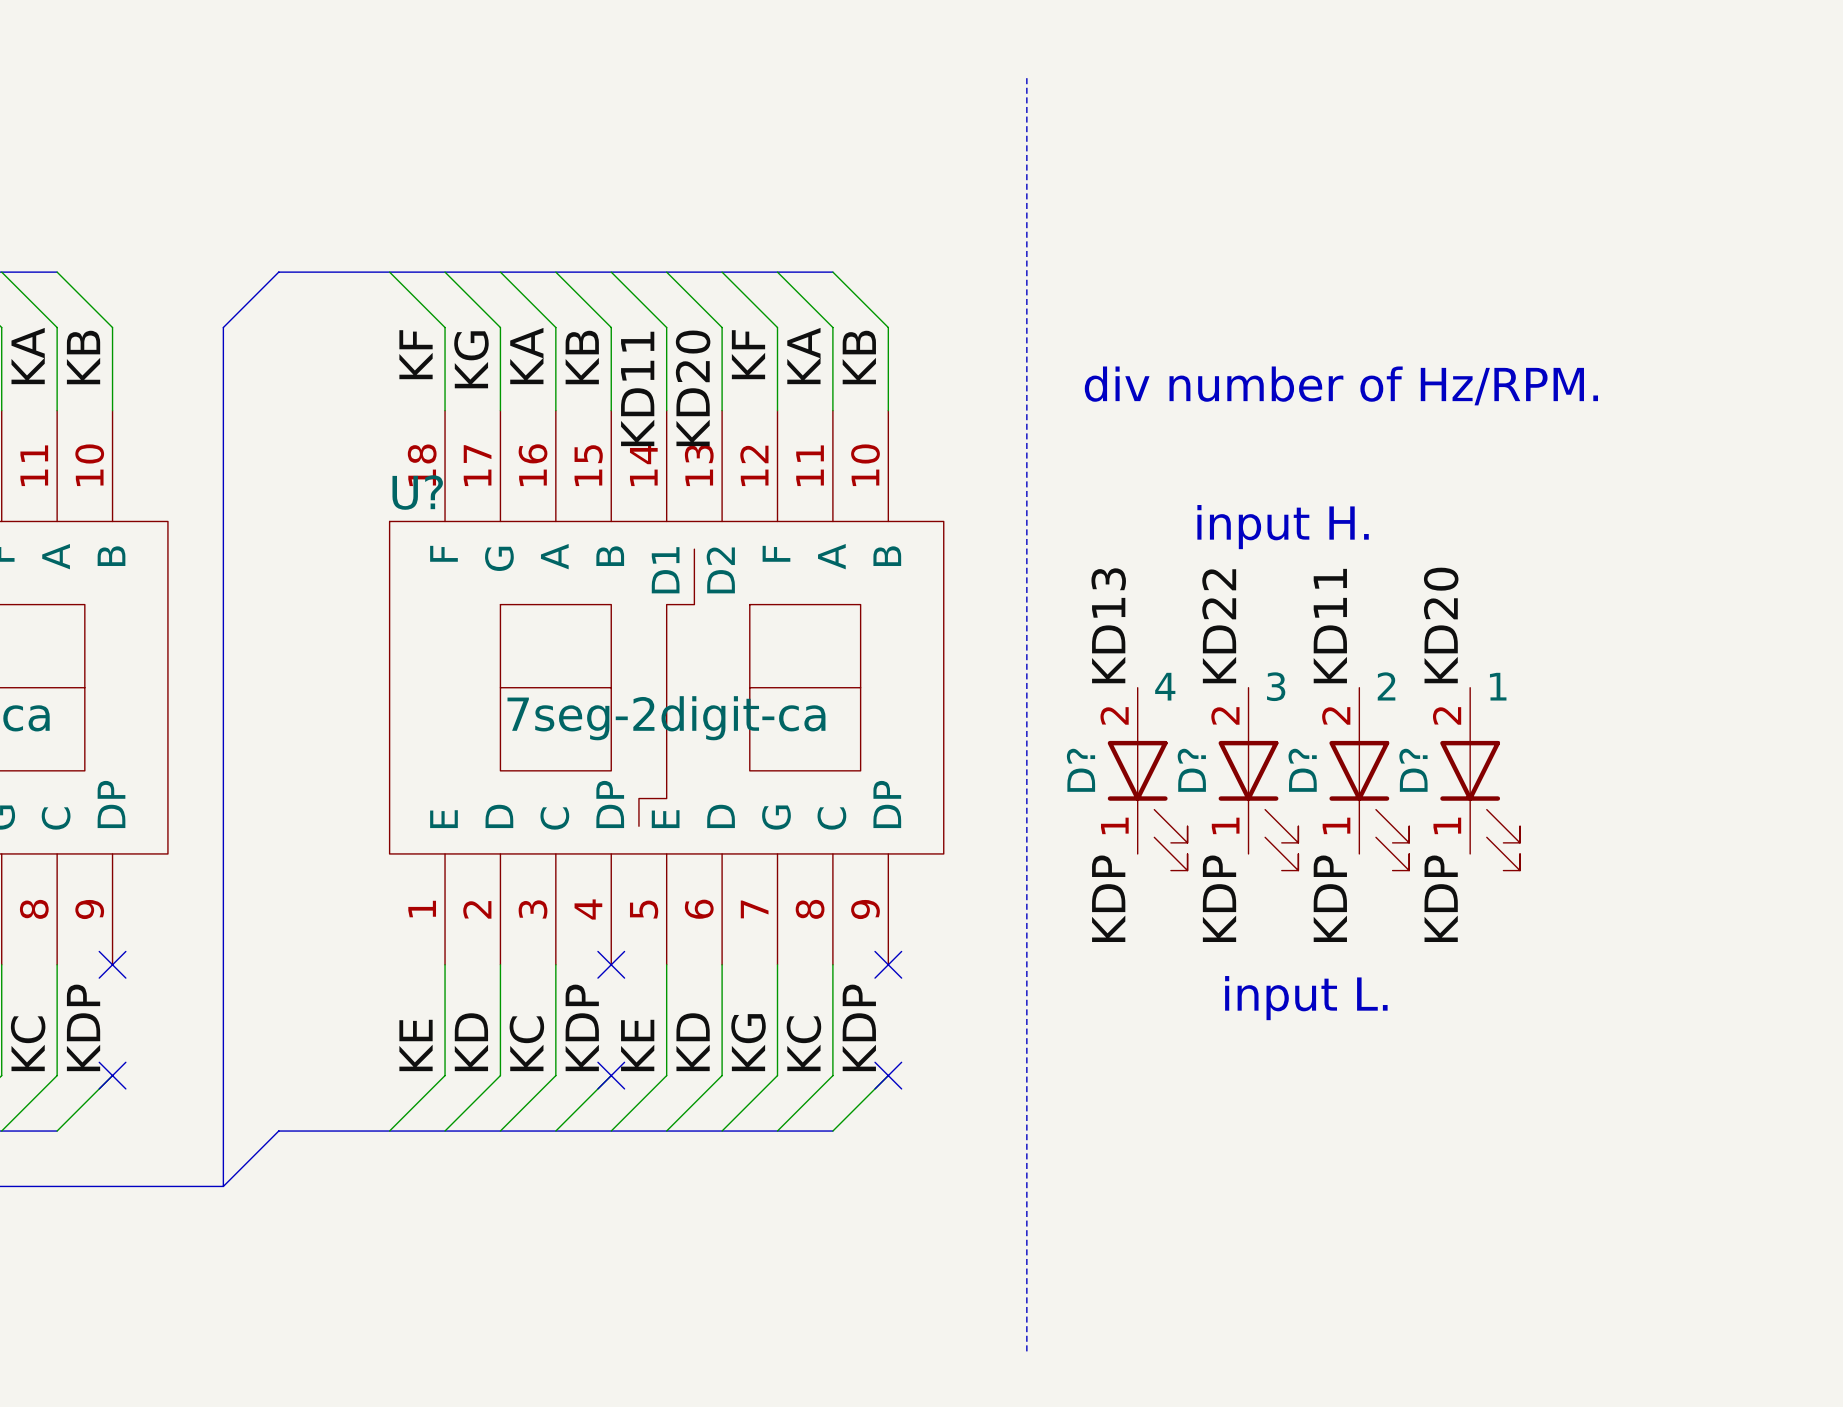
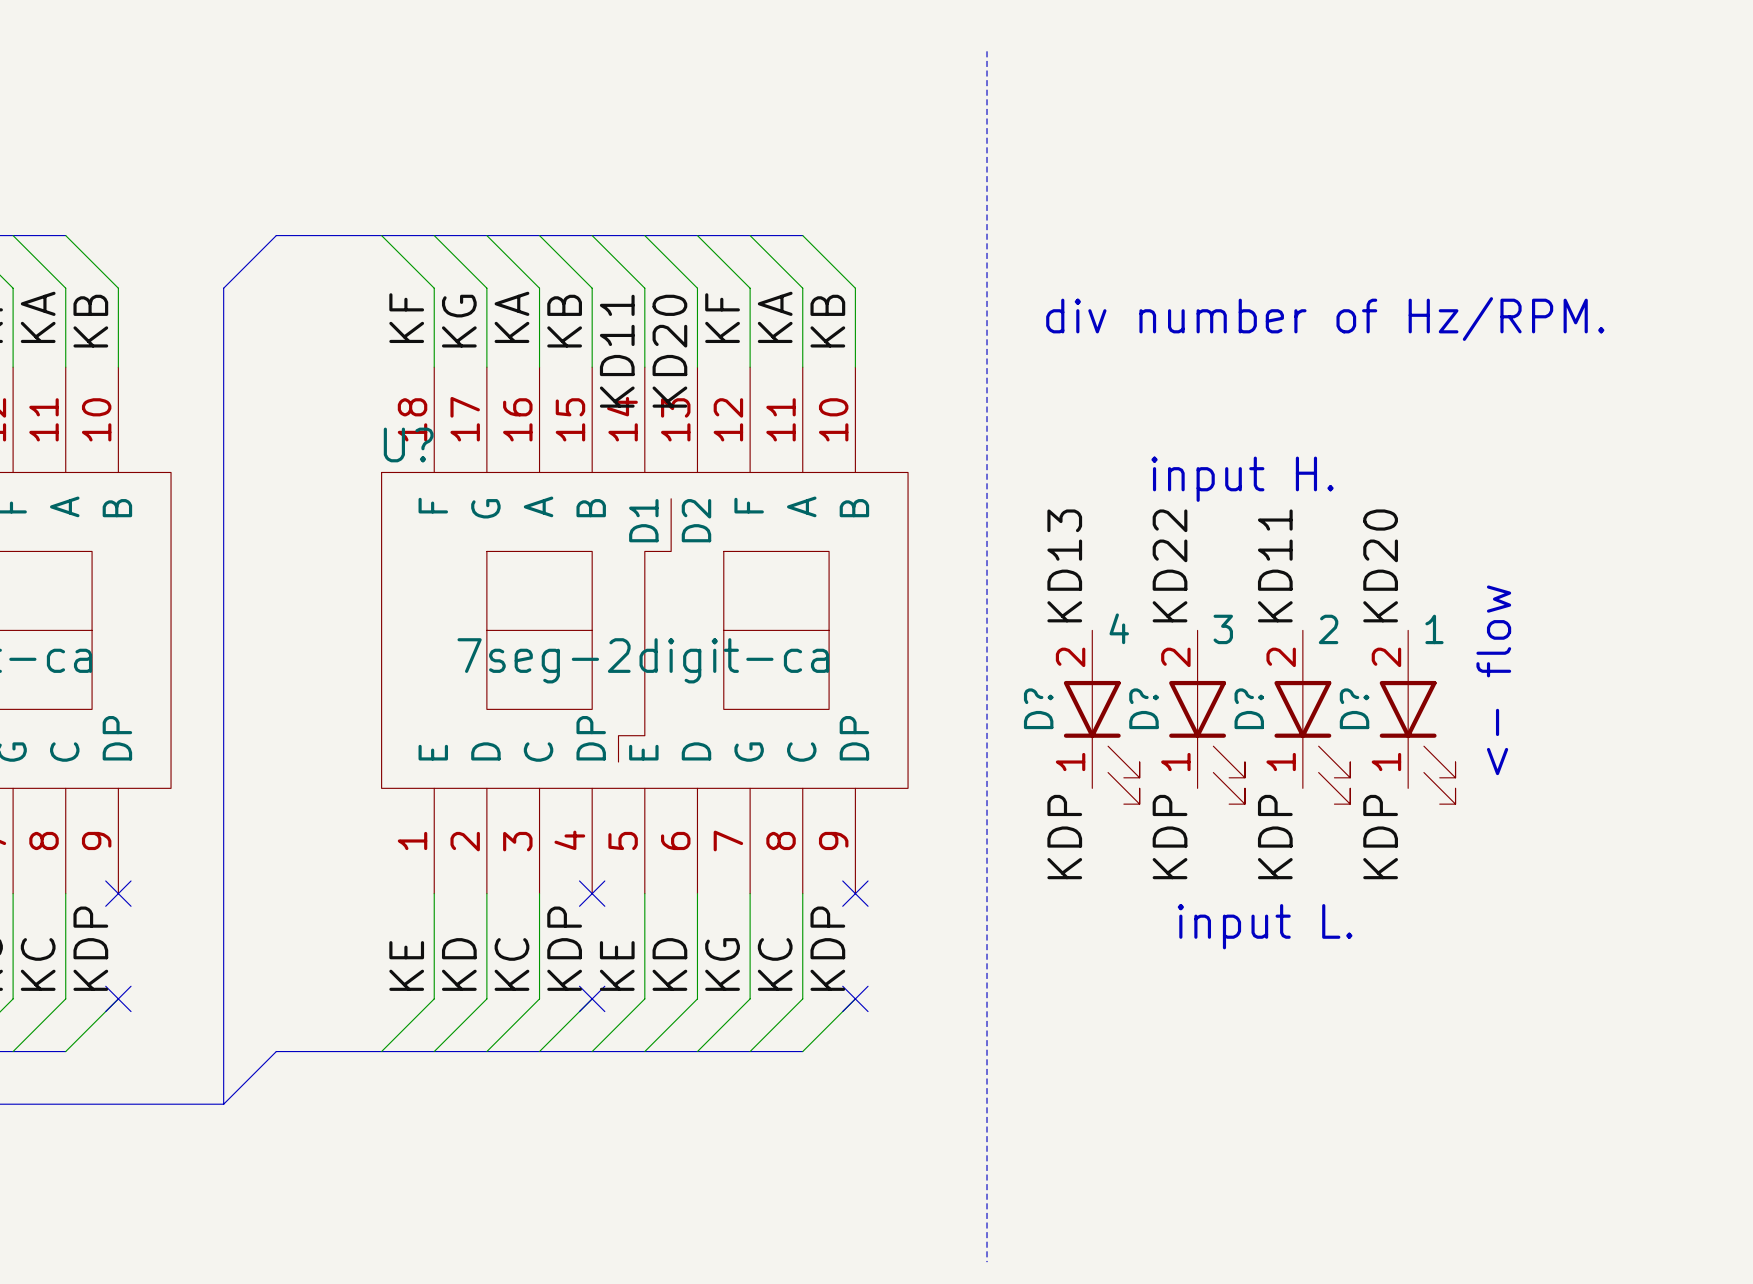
text position: div number of Hz/RPM. (1341, 385) -> div number of Hz/RPM. (1325, 319)
text: none -> <- flow (1493, 680)

